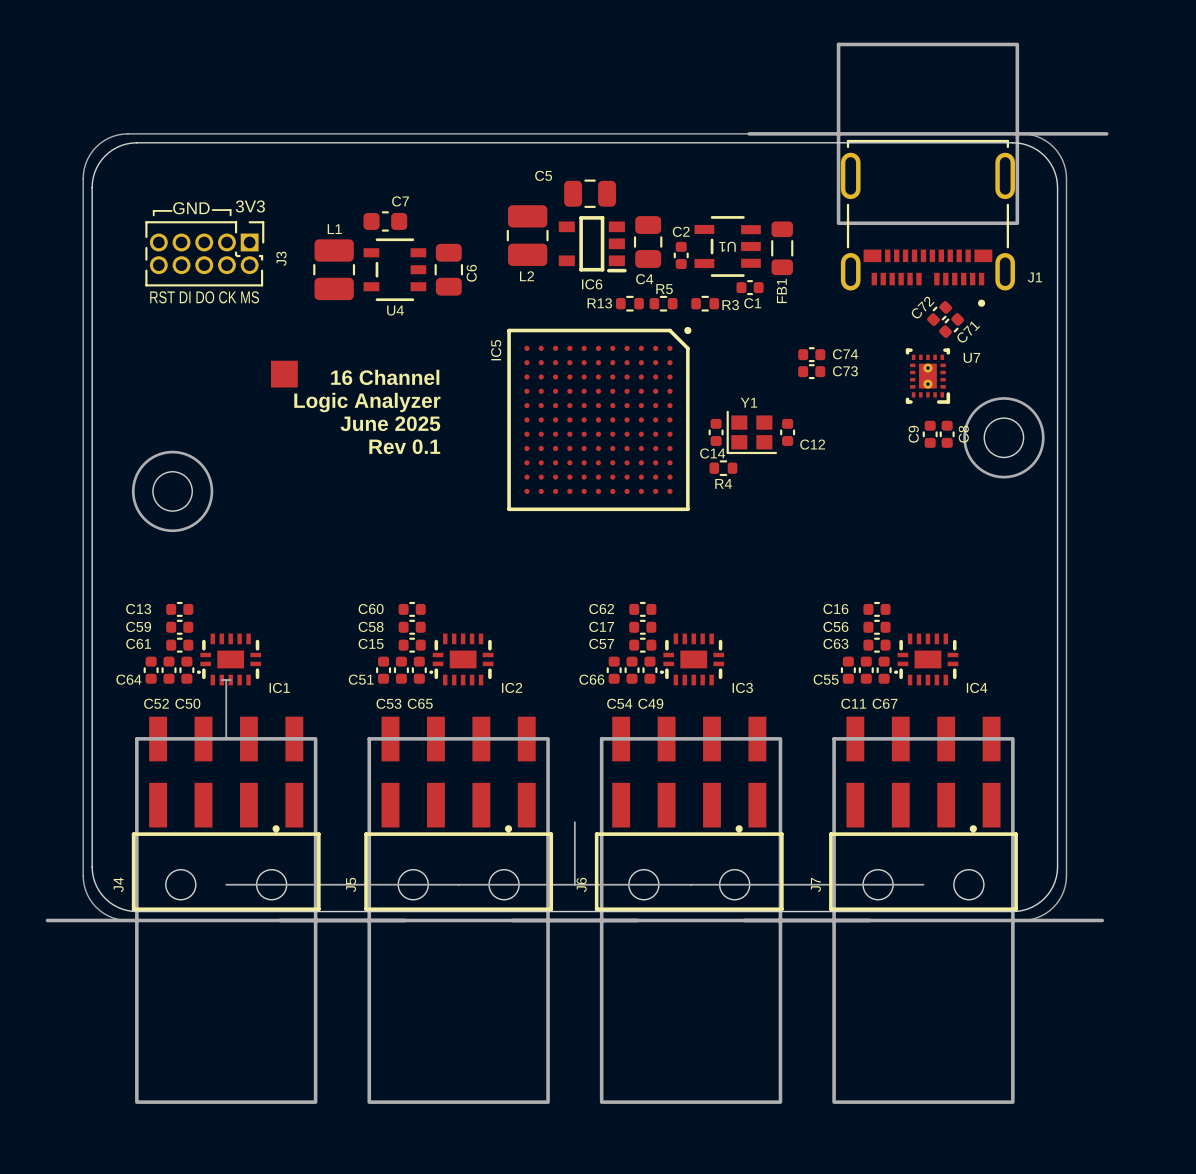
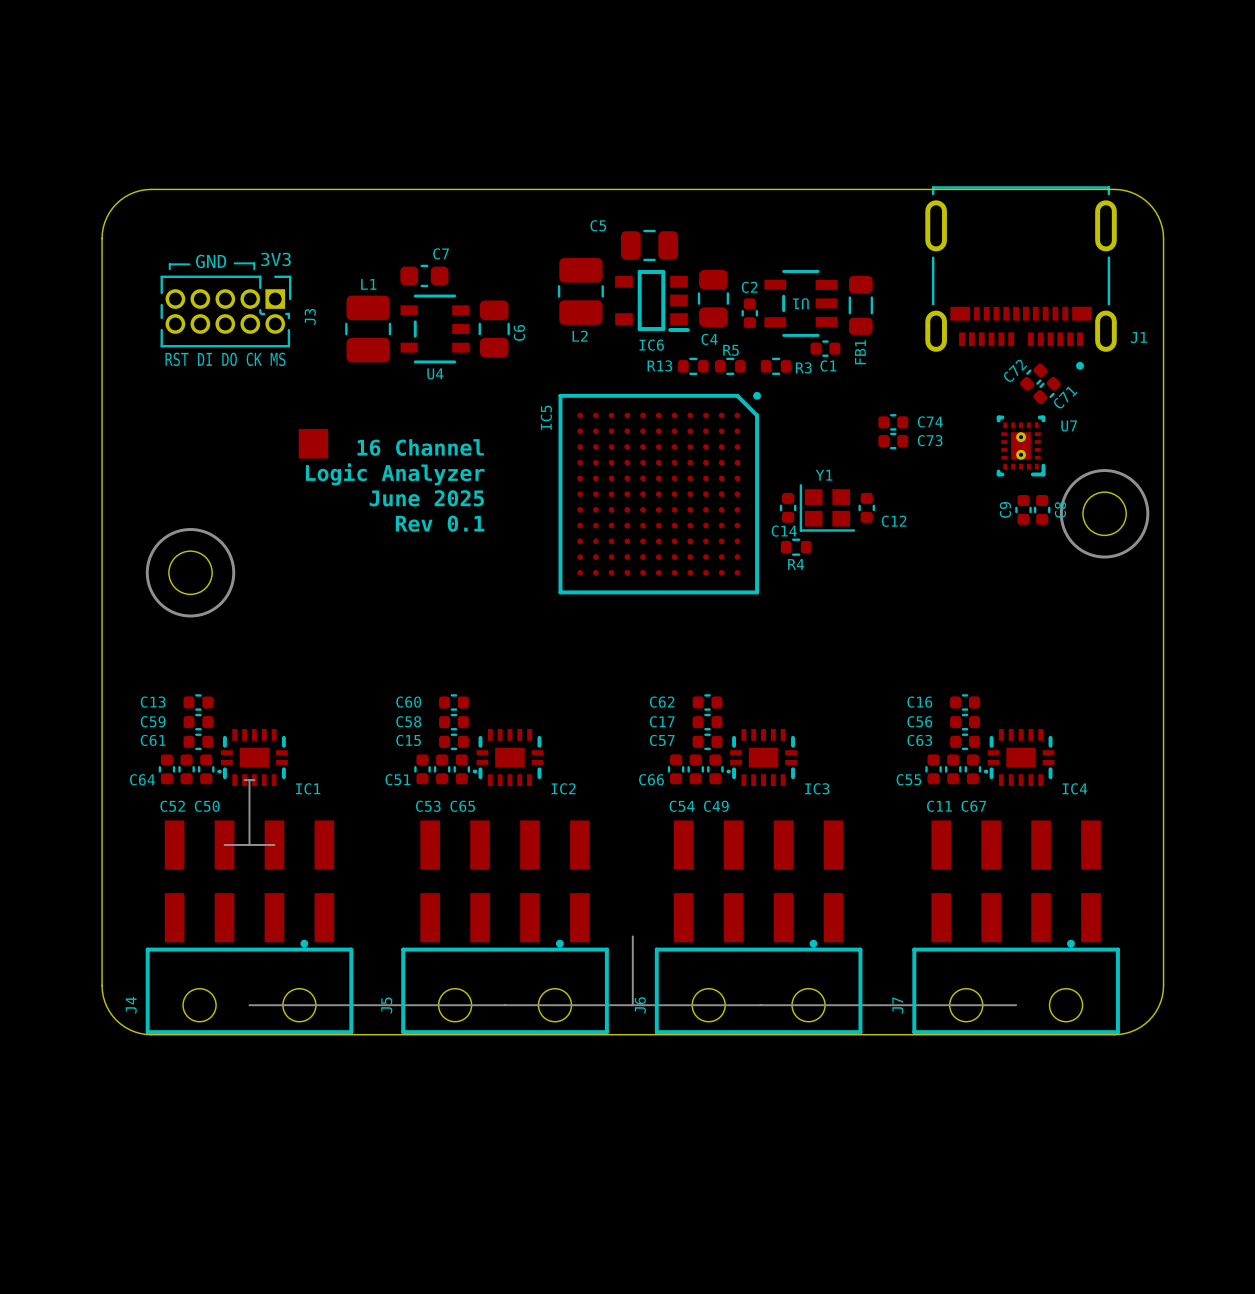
drawing: [747, 42, 1109, 226] -> none
line: (127, 133) (1021, 133) (1036, 136) (1049, 143) (1062, 159) (1066, 178) (1066, 875) (1063, 890) (1056, 903) (1041, 916) (1021, 920) (127, 920) (113, 917) (100, 910) (87, 895) (83, 875) (83, 178) (87, 159) (96, 146) (113, 136) (127, 133) -> none
drawing: [45, 737, 1105, 1104] -> none

